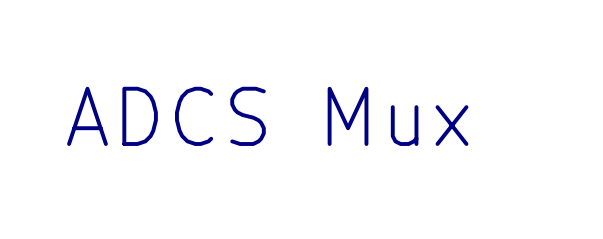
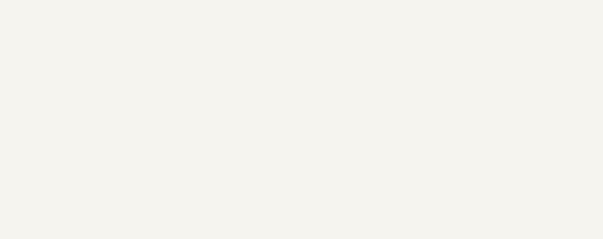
text: ADCS Mux (267, 116) -> none

